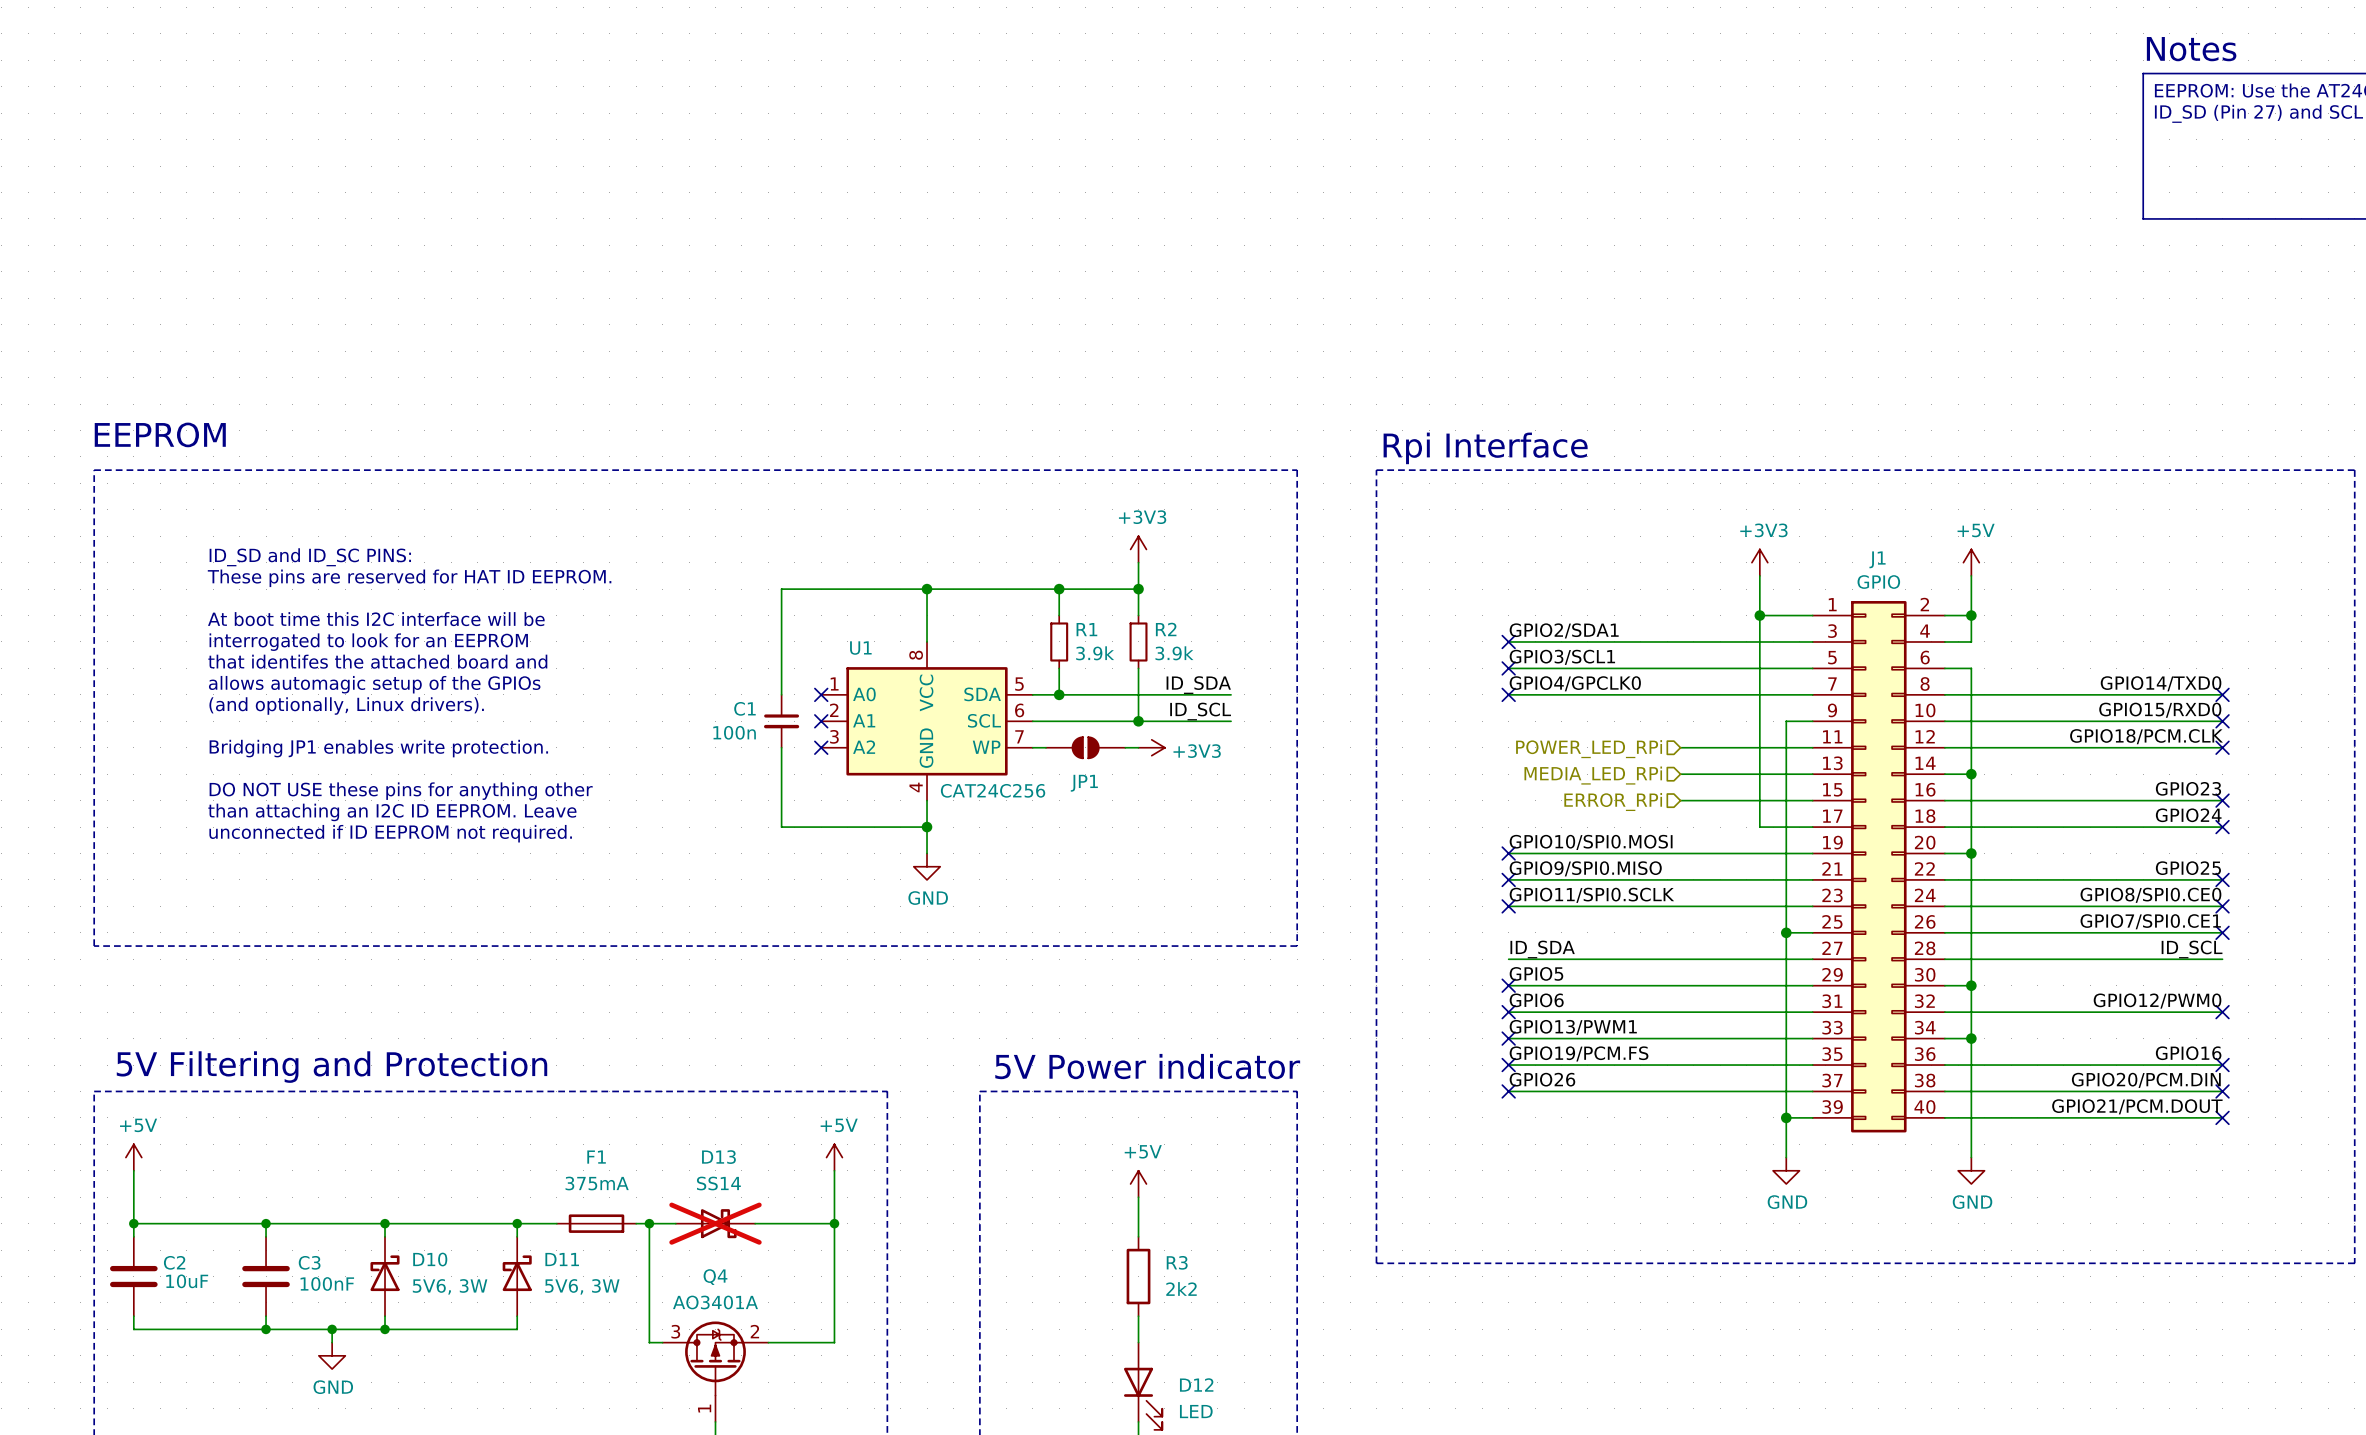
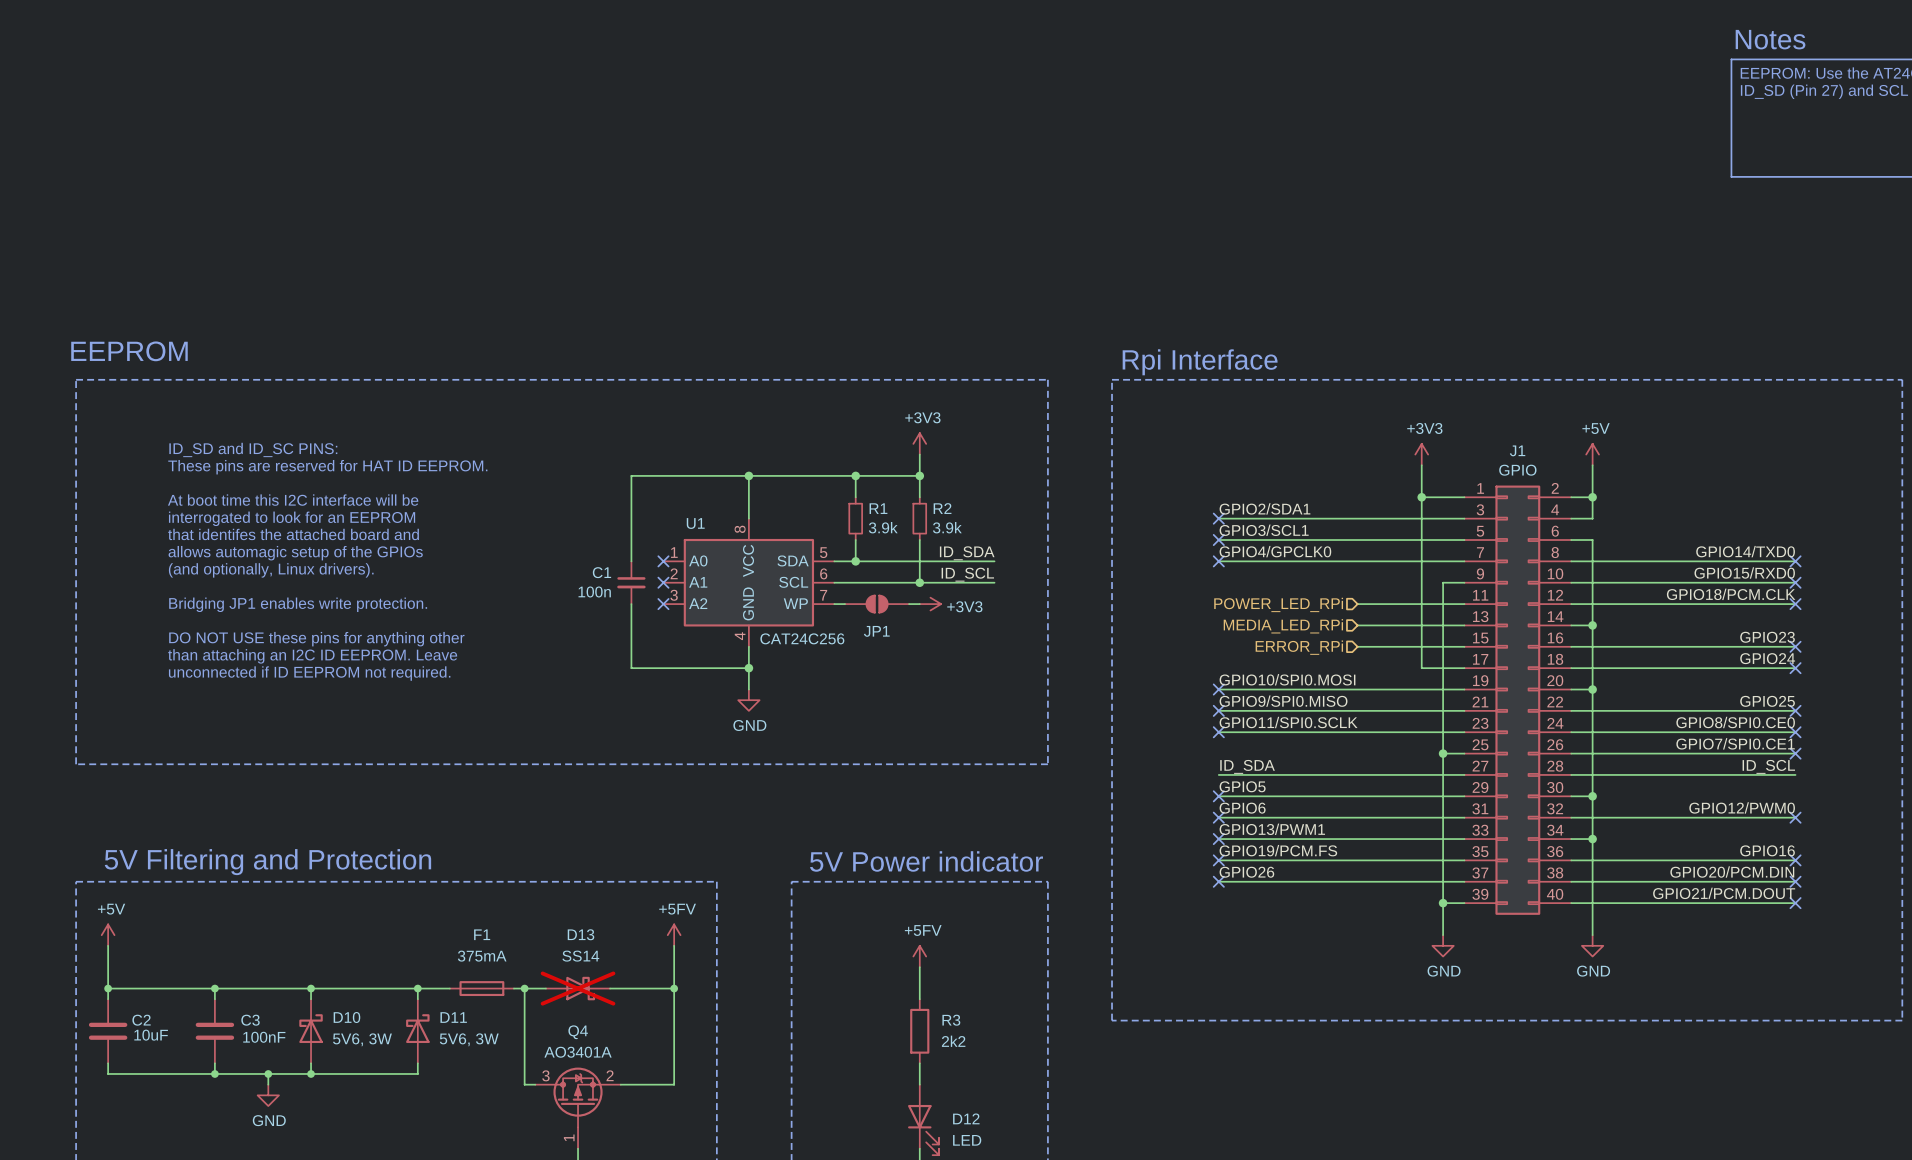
power symbol: +5V (834, 1157) -> +5FV (674, 935)
power symbol: +5V (1138, 1183) -> +5FV (919, 956)

